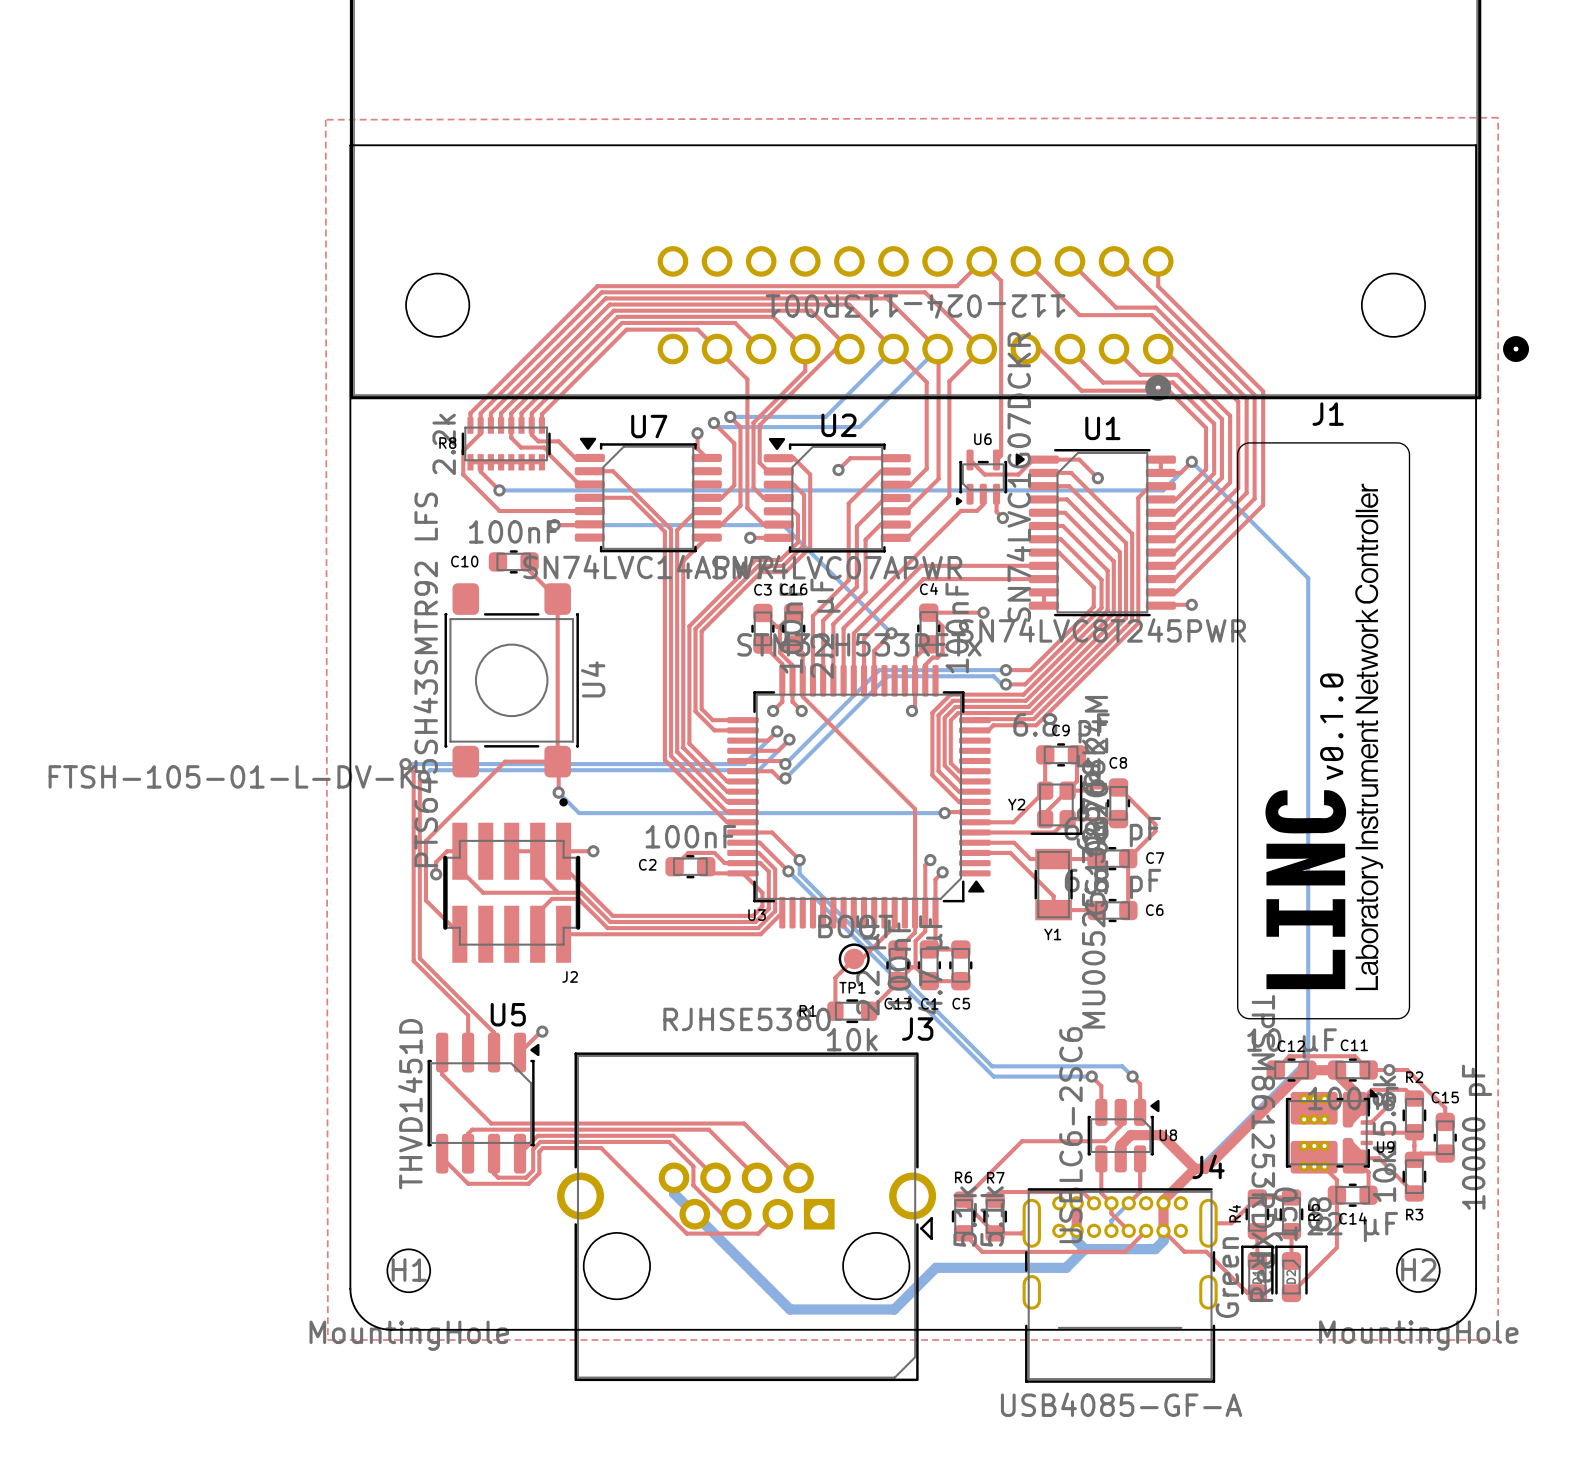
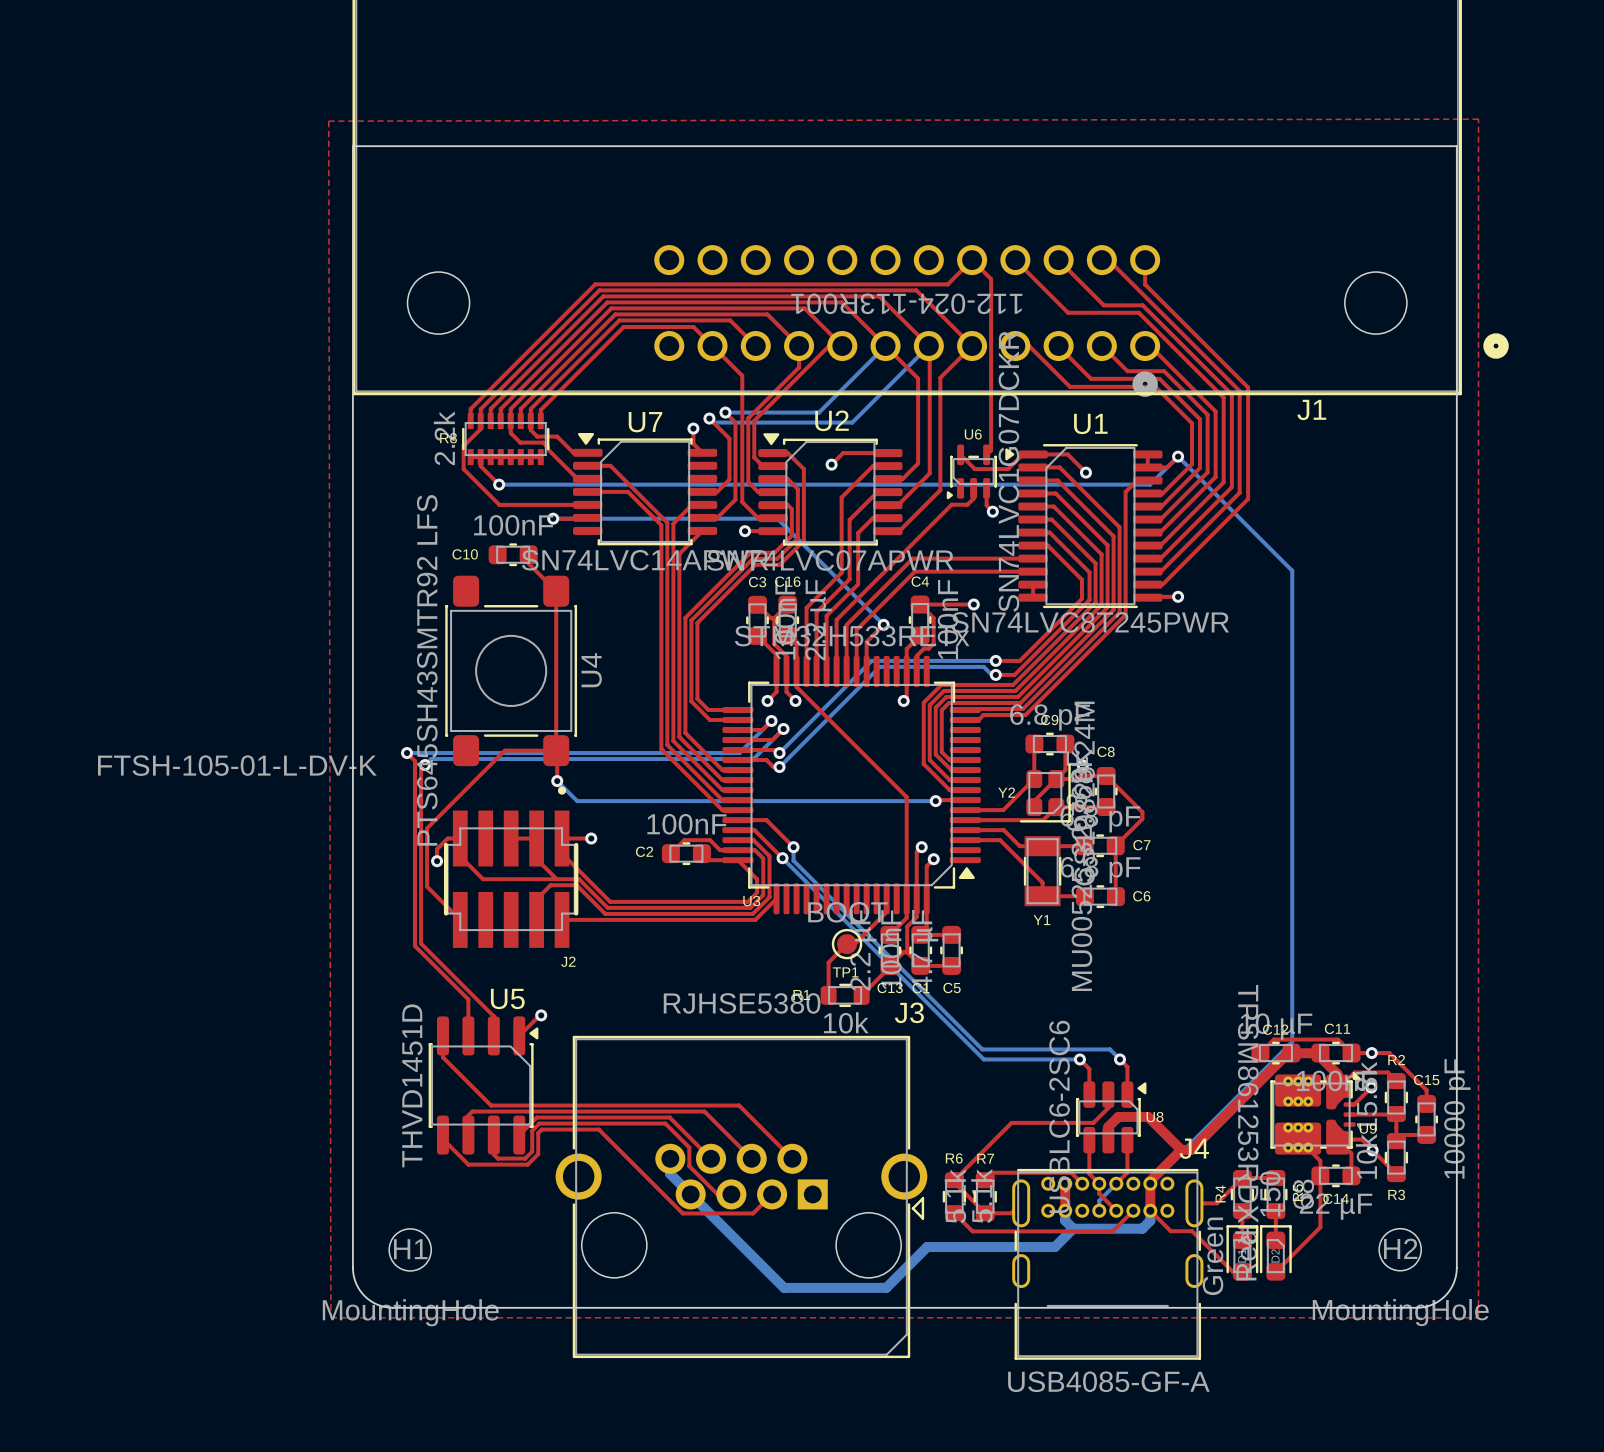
drawing: [1237, 442, 1411, 1020] -> none

